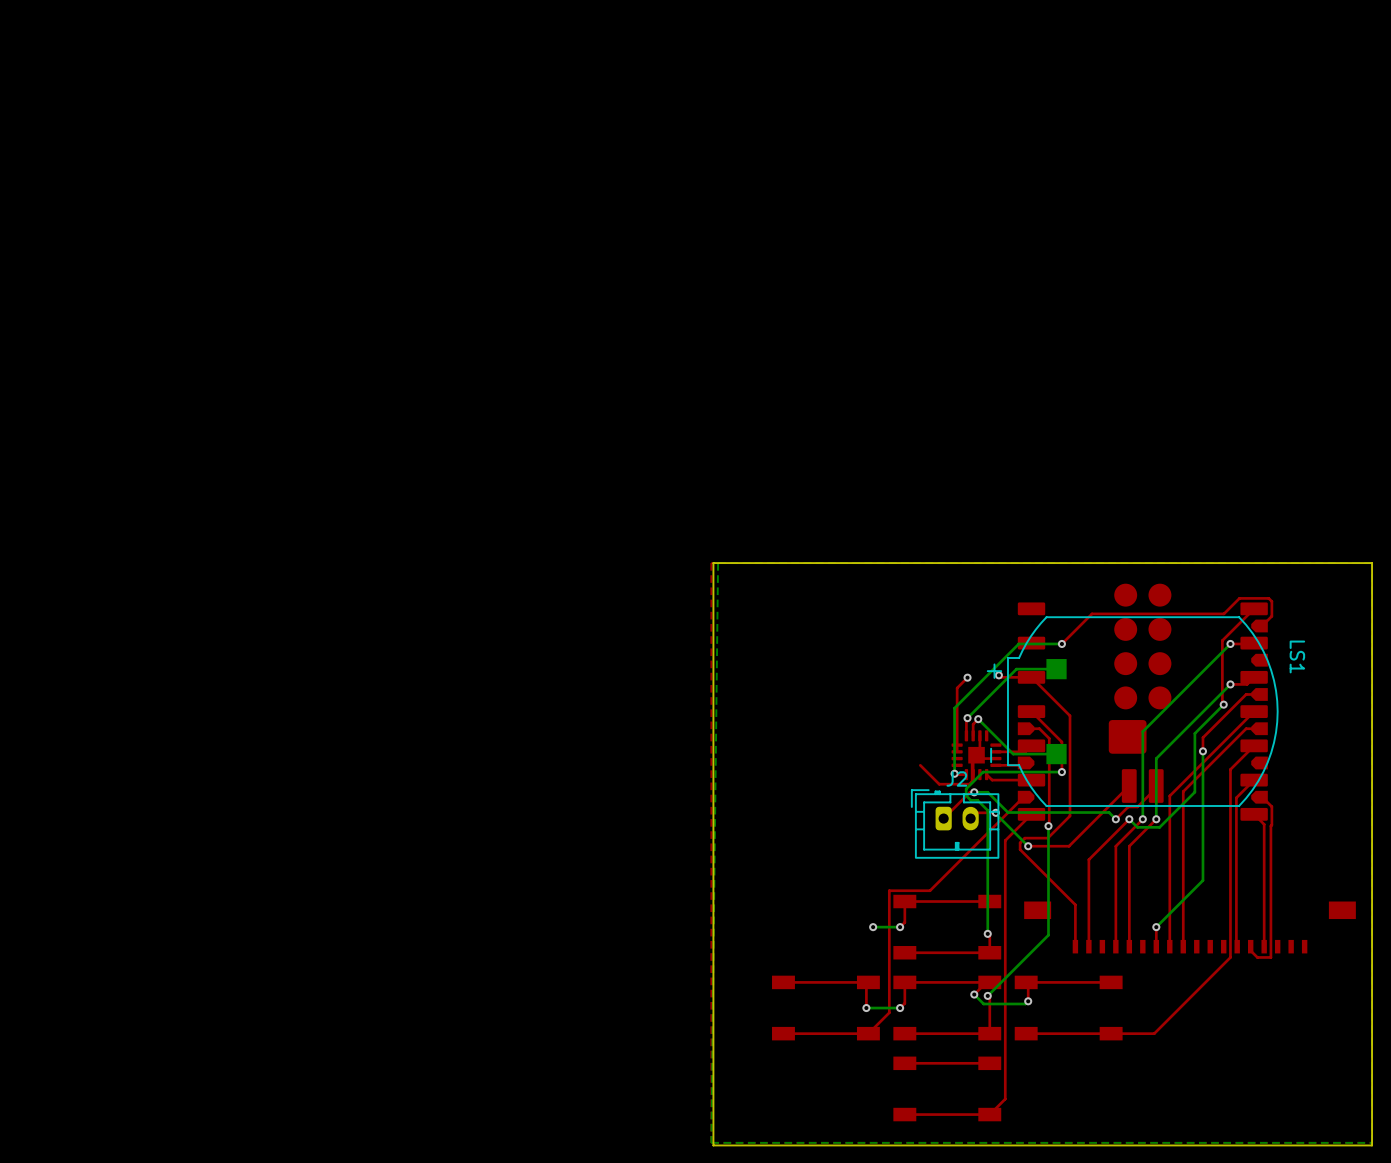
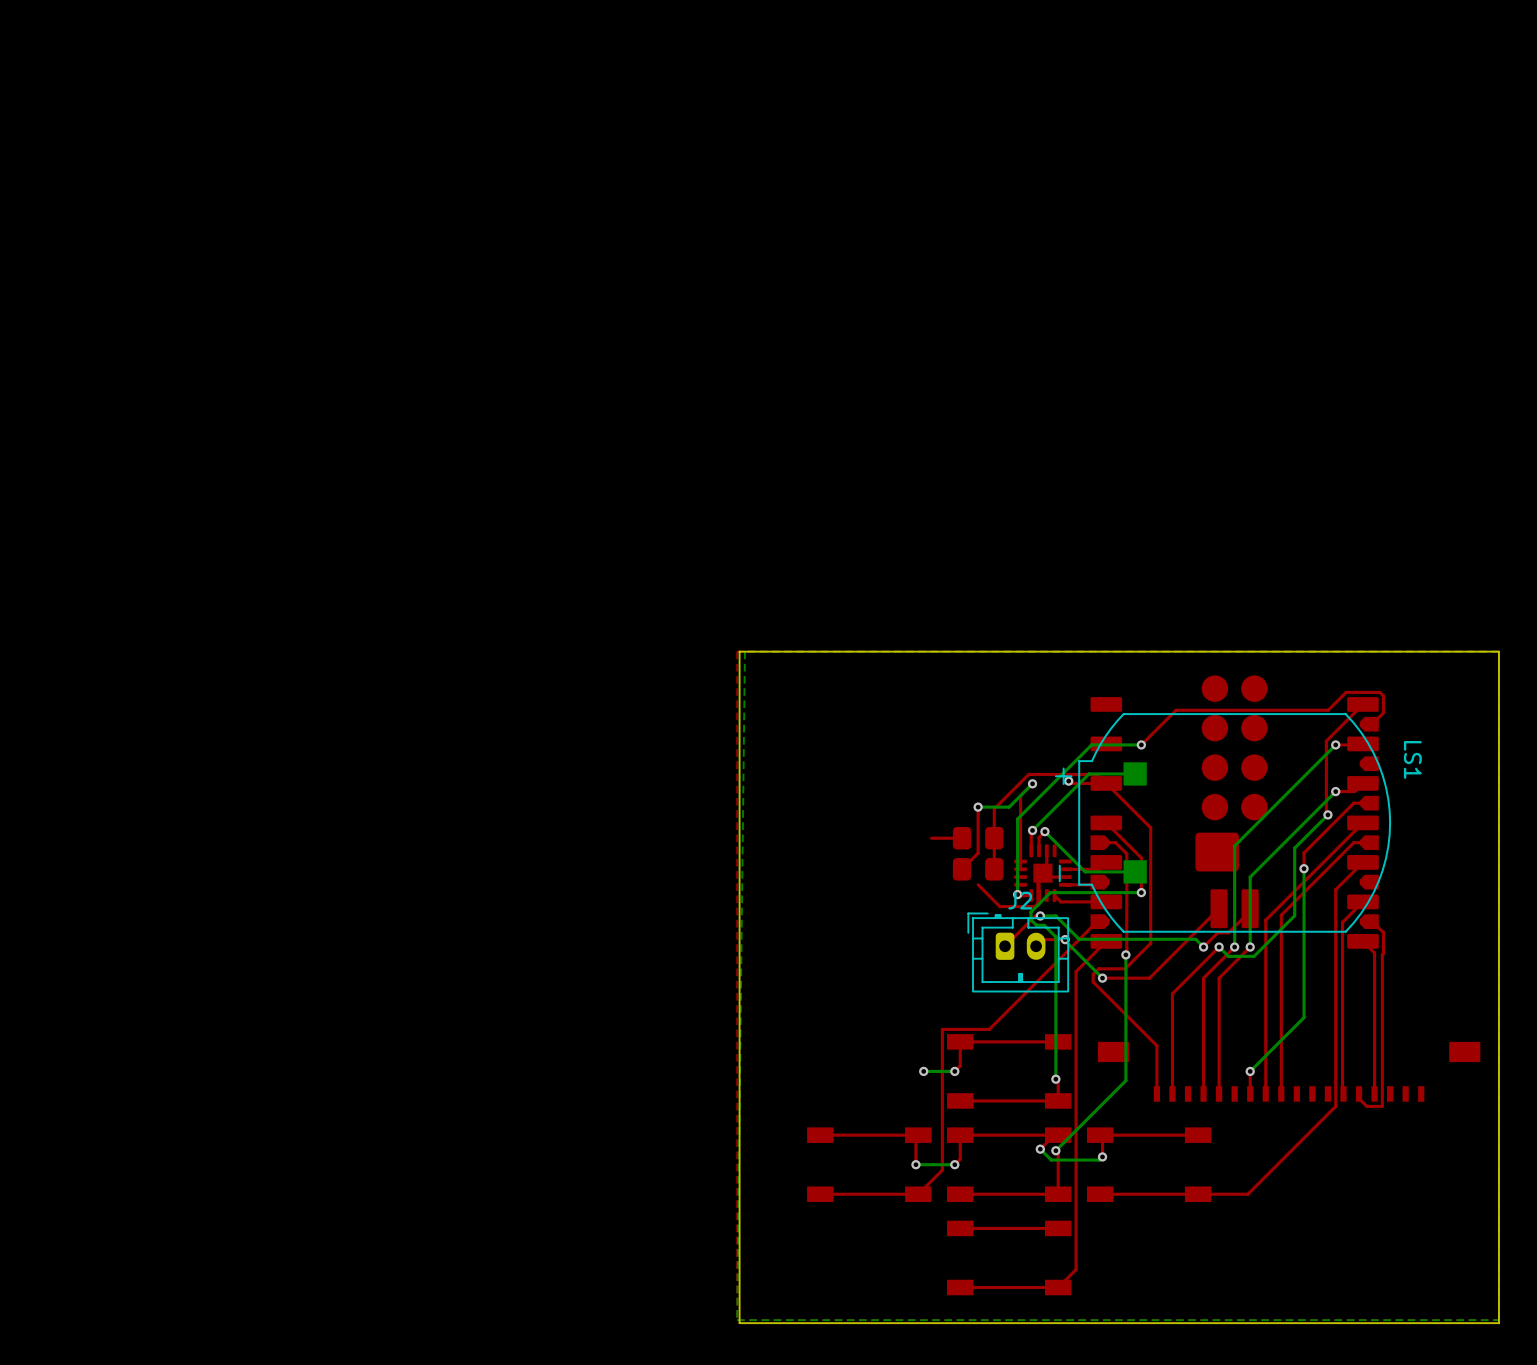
bottom track: none -> (1032, 783) (1009, 807) (978, 807)
top track: none -> (1106, 783) (1097, 774) (1028, 774) (994, 808) (994, 869)
top track: none -> (978, 807) (978, 853) (962, 869)
via: none -> (978, 807)
top track: none -> (962, 838) (931, 838)
part: none -> (978, 838)
part: none -> (978, 869)

